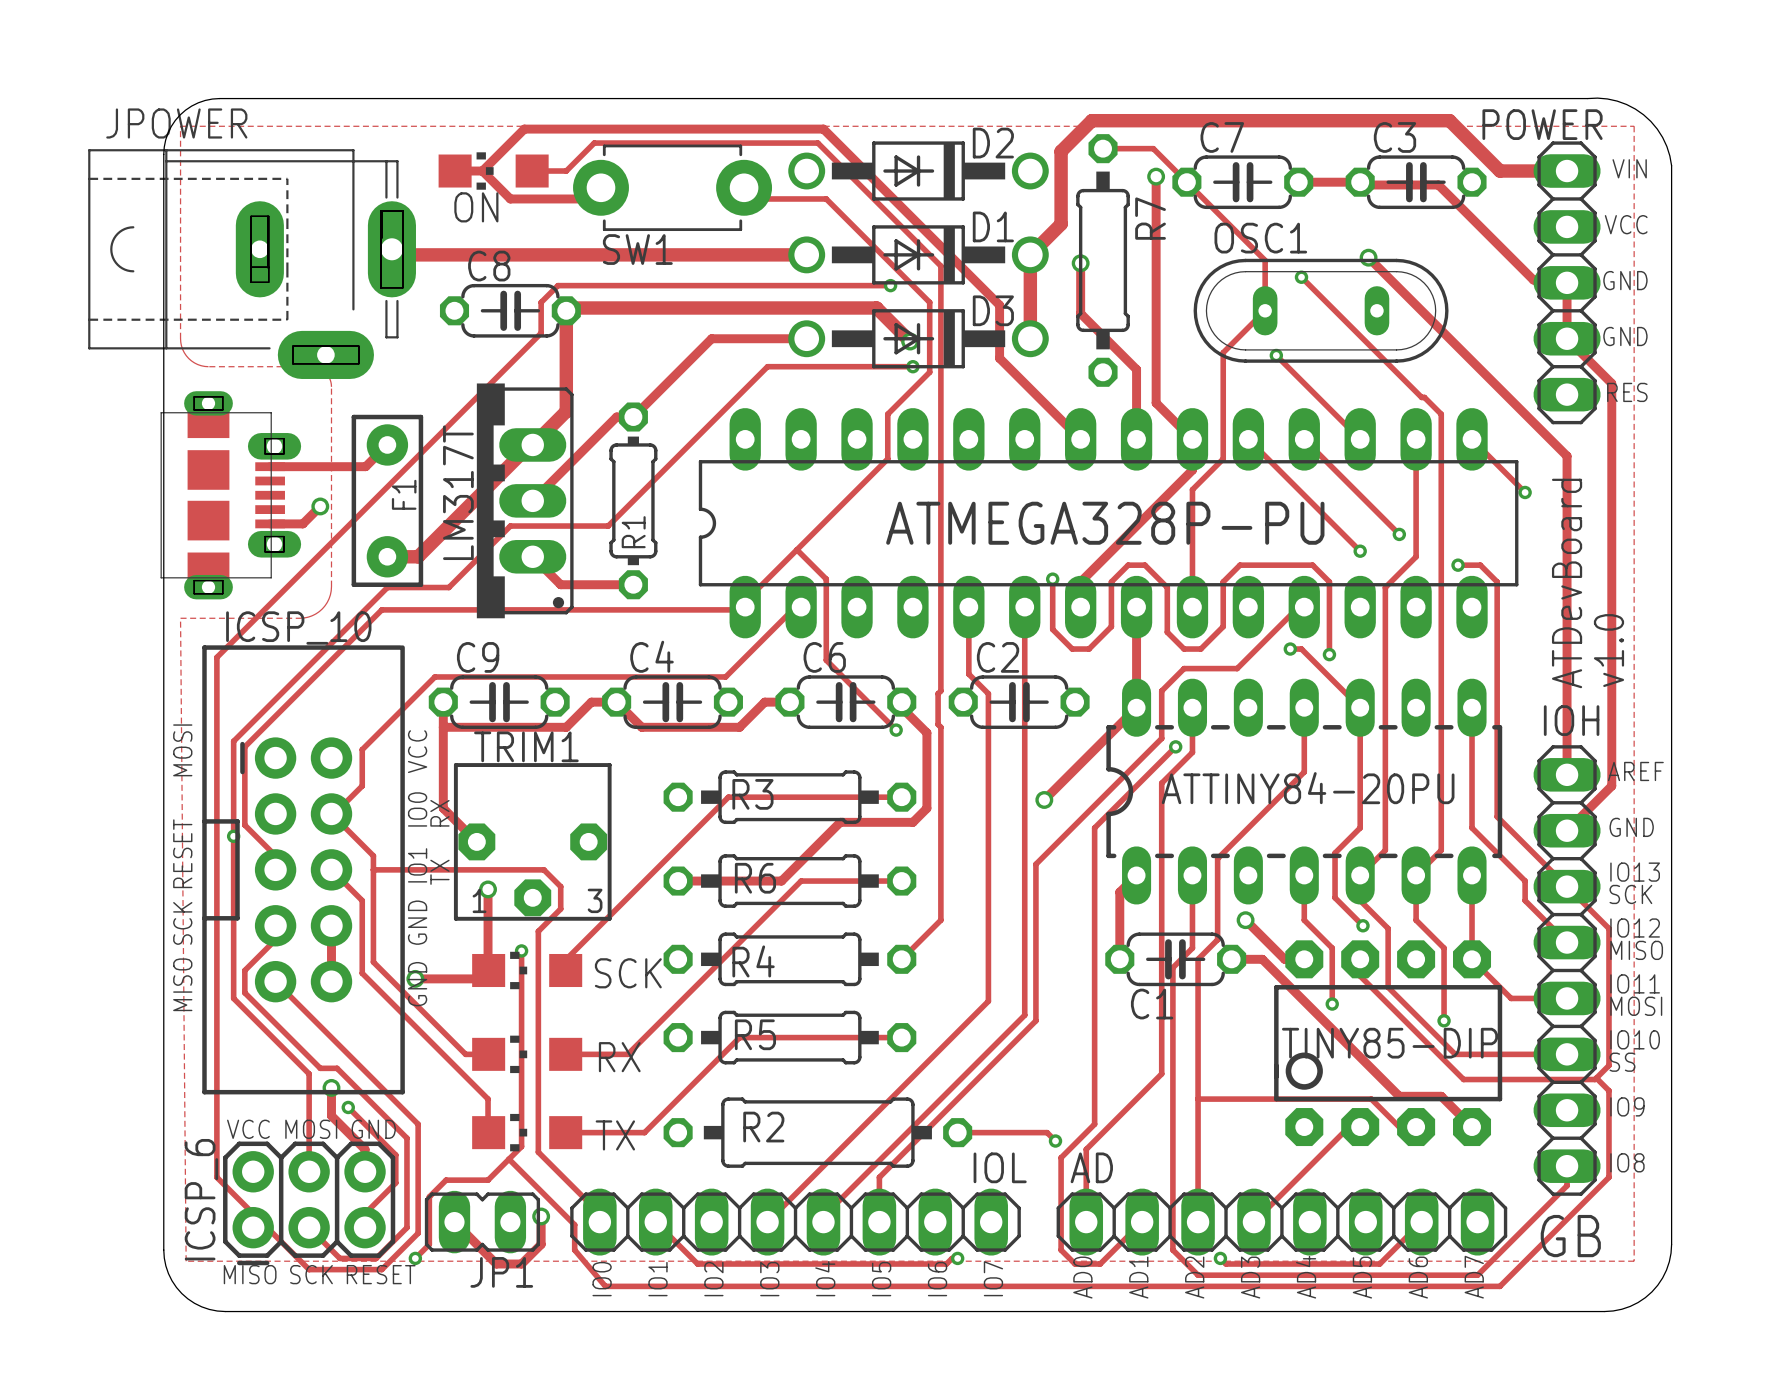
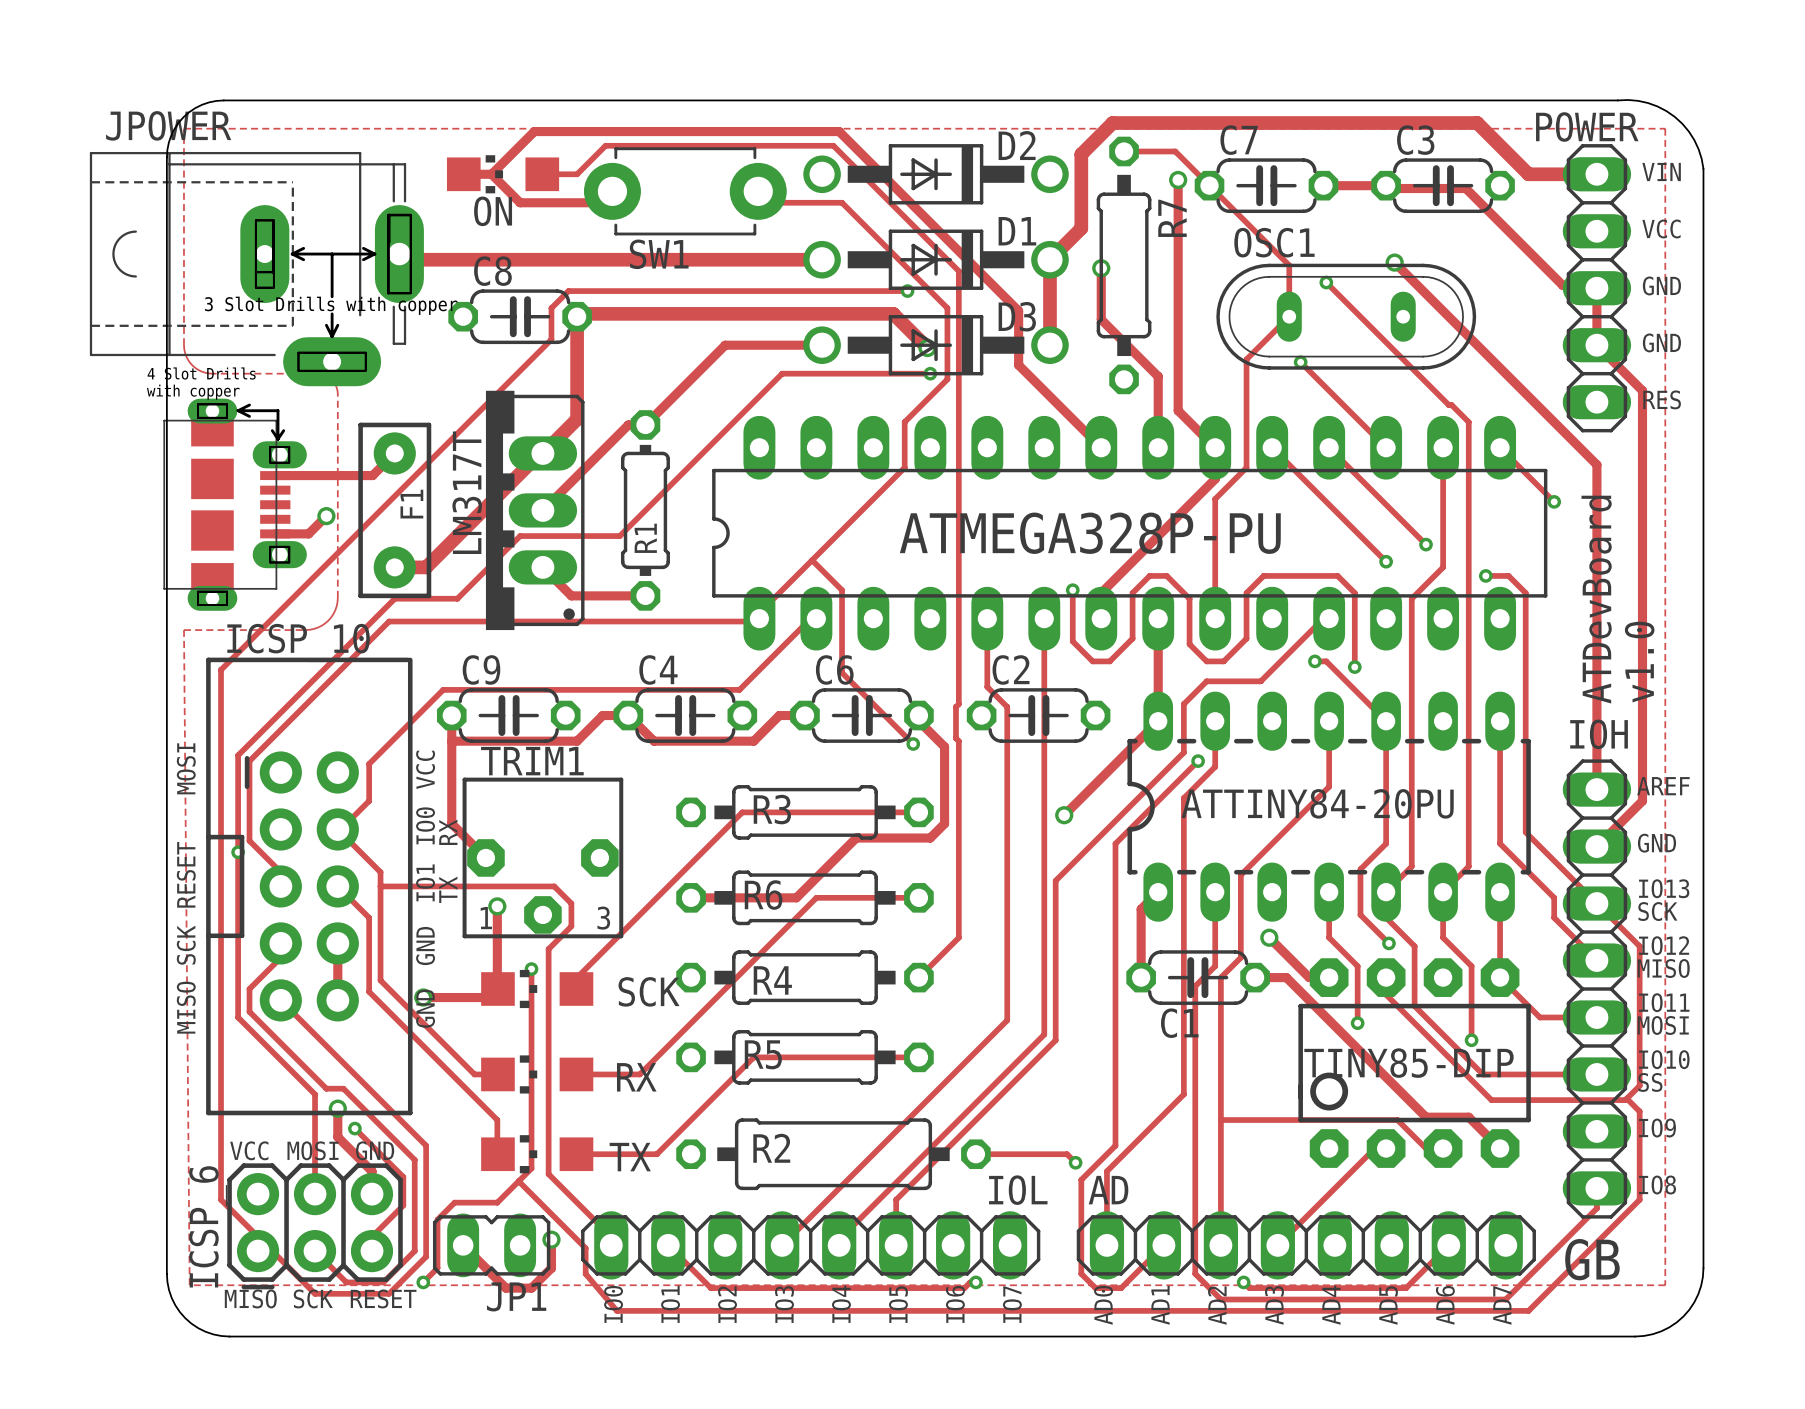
JPOWER footprint: [88, 149, 416, 379] -> [89, 151, 424, 387]
part footprint: [160, 391, 302, 600] -> [163, 398, 307, 611]

